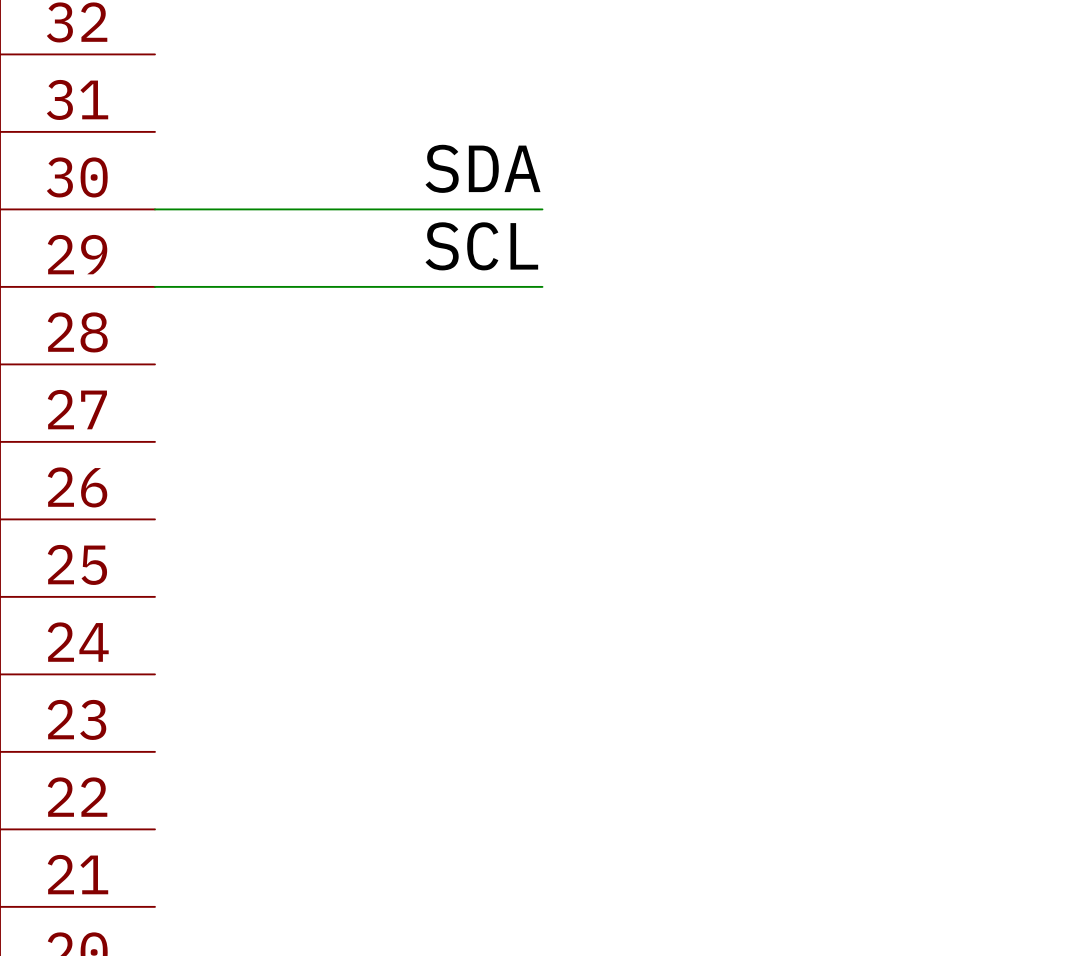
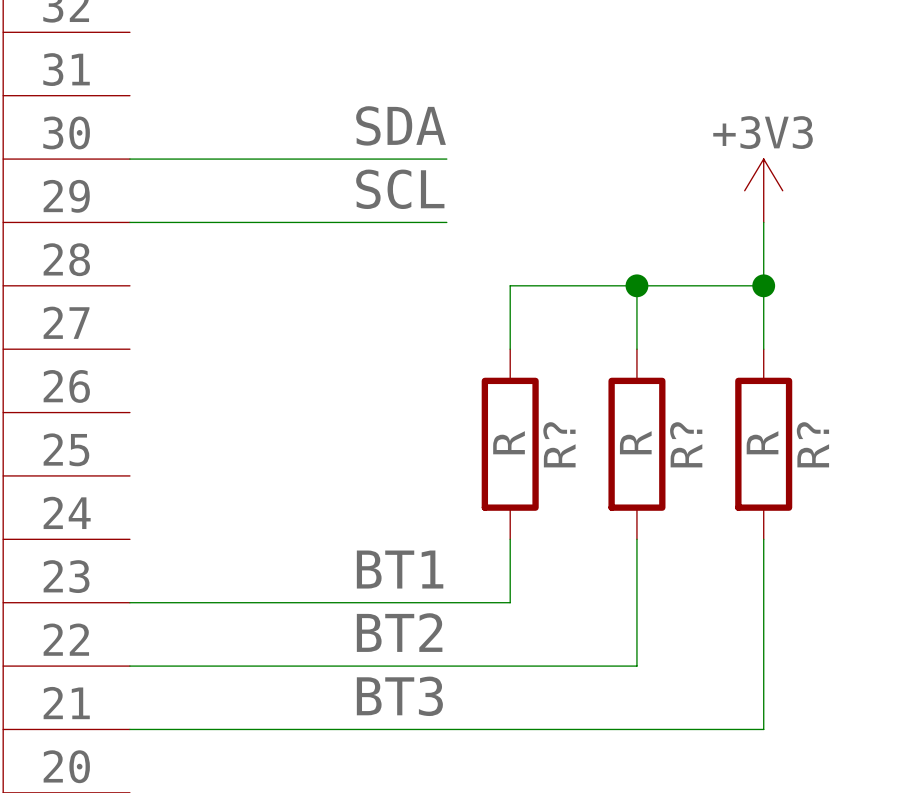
power symbol: none -> +3V3 (763, 190)
wire: none -> (763, 222) (763, 349)
wire: none -> (636, 285) (636, 349)
junction: none -> (636, 285)
wire: none -> (763, 285) (510, 285) (510, 349)
junction: none -> (763, 285)
R?: none -> R (510, 444)
R?: none -> R (636, 444)
R?: none -> R (763, 444)
wire: none -> (510, 539) (510, 602) (129, 602)
wire: none -> (636, 539) (636, 666) (129, 666)
wire: none -> (763, 539) (763, 729) (129, 729)
label: none -> BT1 (400, 569)
label: none -> BT2 (399, 632)
label: none -> BT3 (399, 696)

